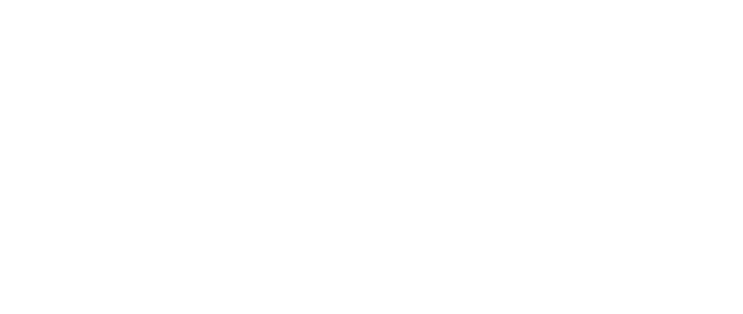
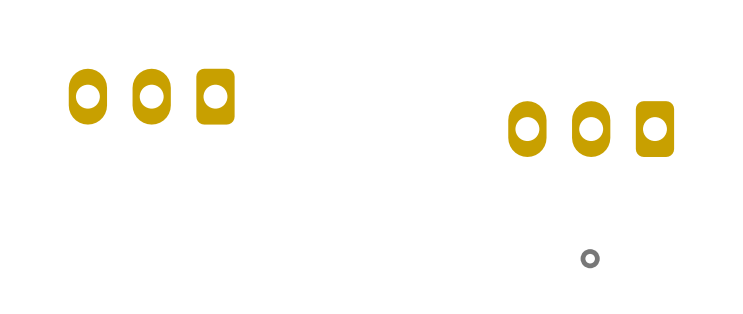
part: none -> (151, 96)
part: none -> (591, 129)
via: none -> (590, 258)

